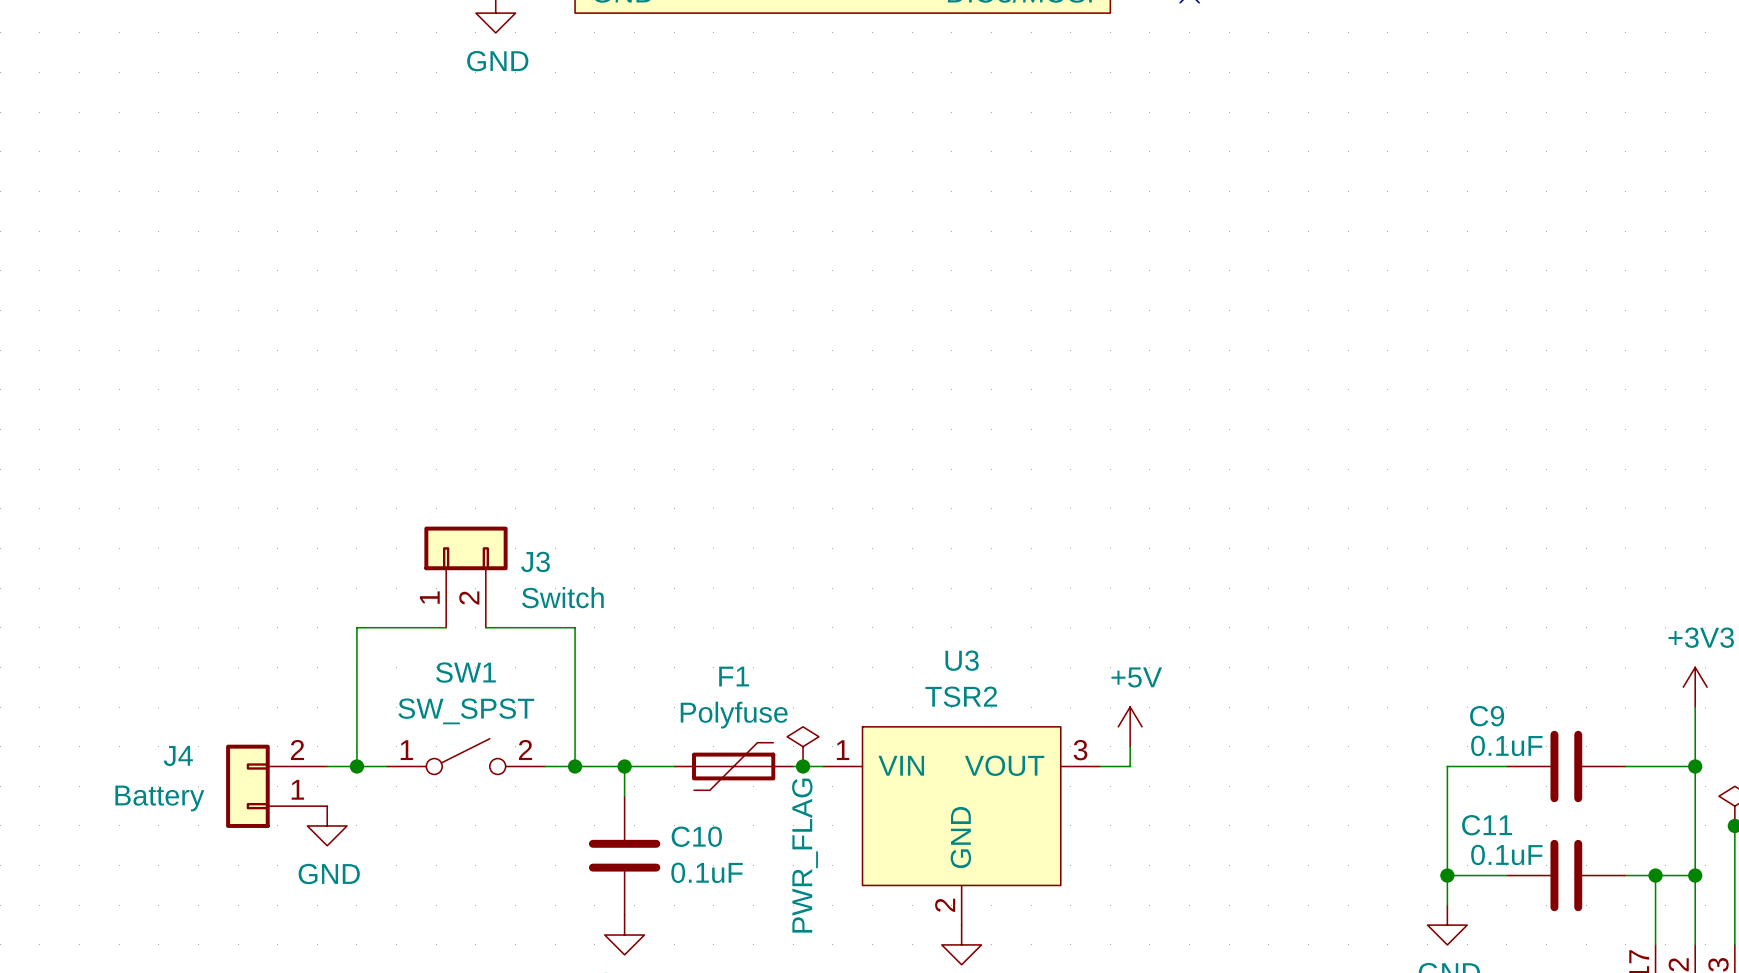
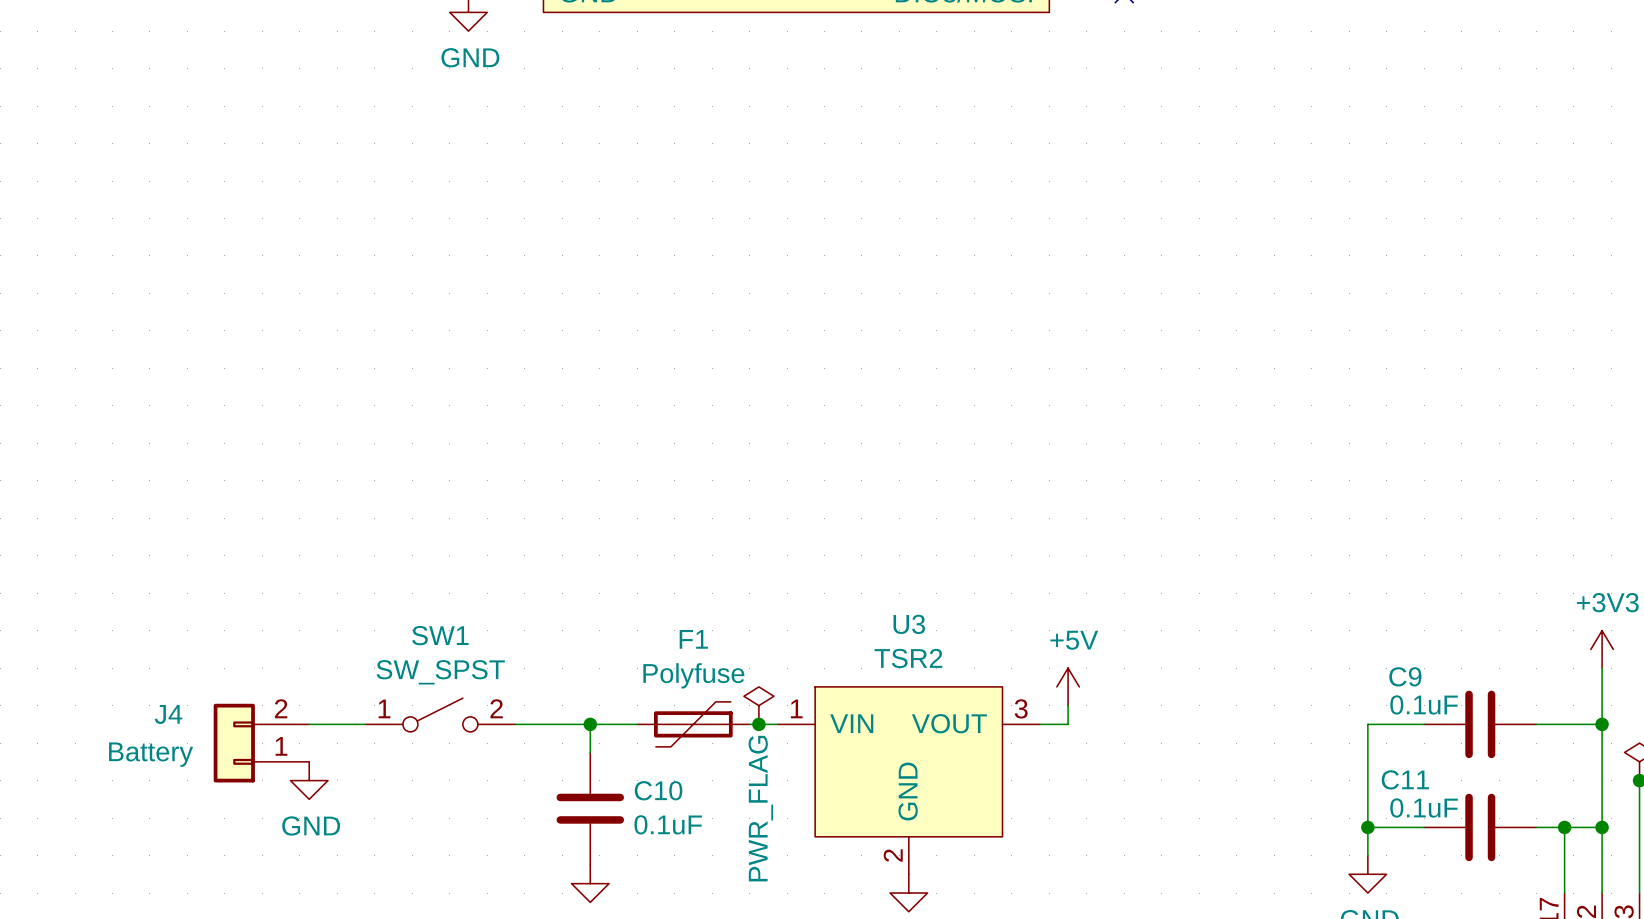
J3: Switch (465, 577) -> none
wire: (446, 627) (356, 627) (356, 766) -> none
wire: (485, 627) (575, 627) (575, 766) -> none
junction: (356, 766) -> none
junction: (575, 766) -> none

